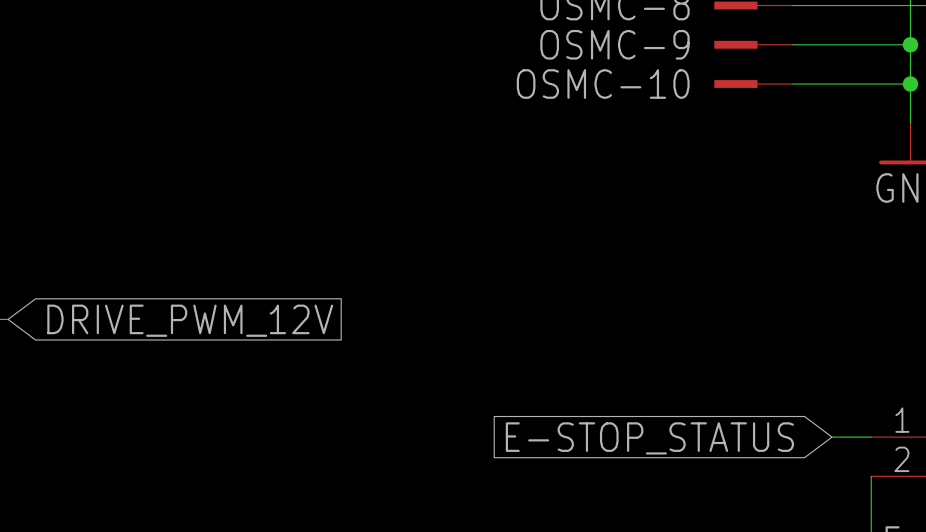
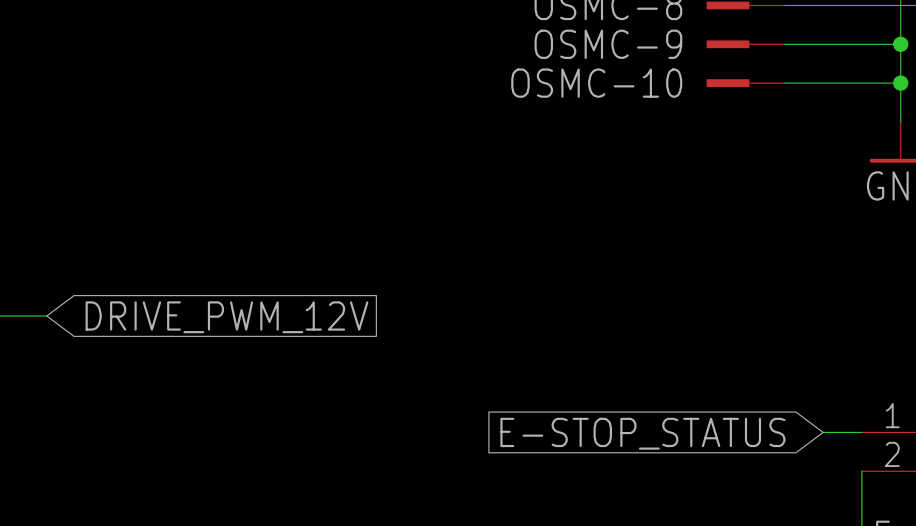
wire: none -> (8, 315) (46, 315)
global label position: DRIVE_PWM_12V (190, 320) -> DRIVE_PWM_12V (227, 317)

